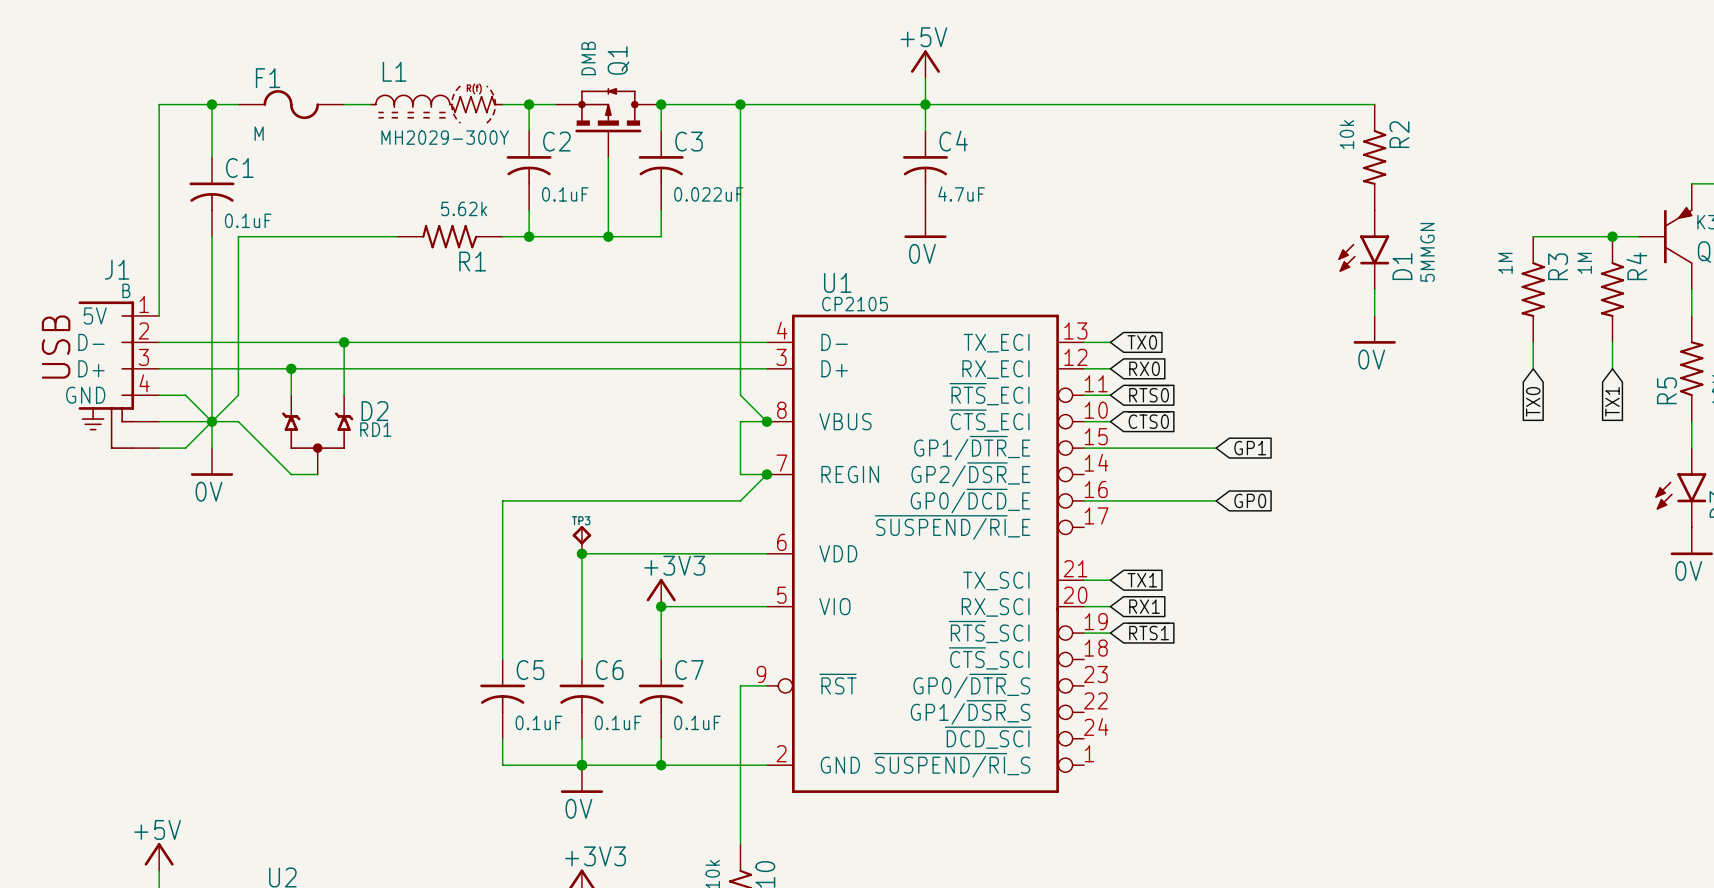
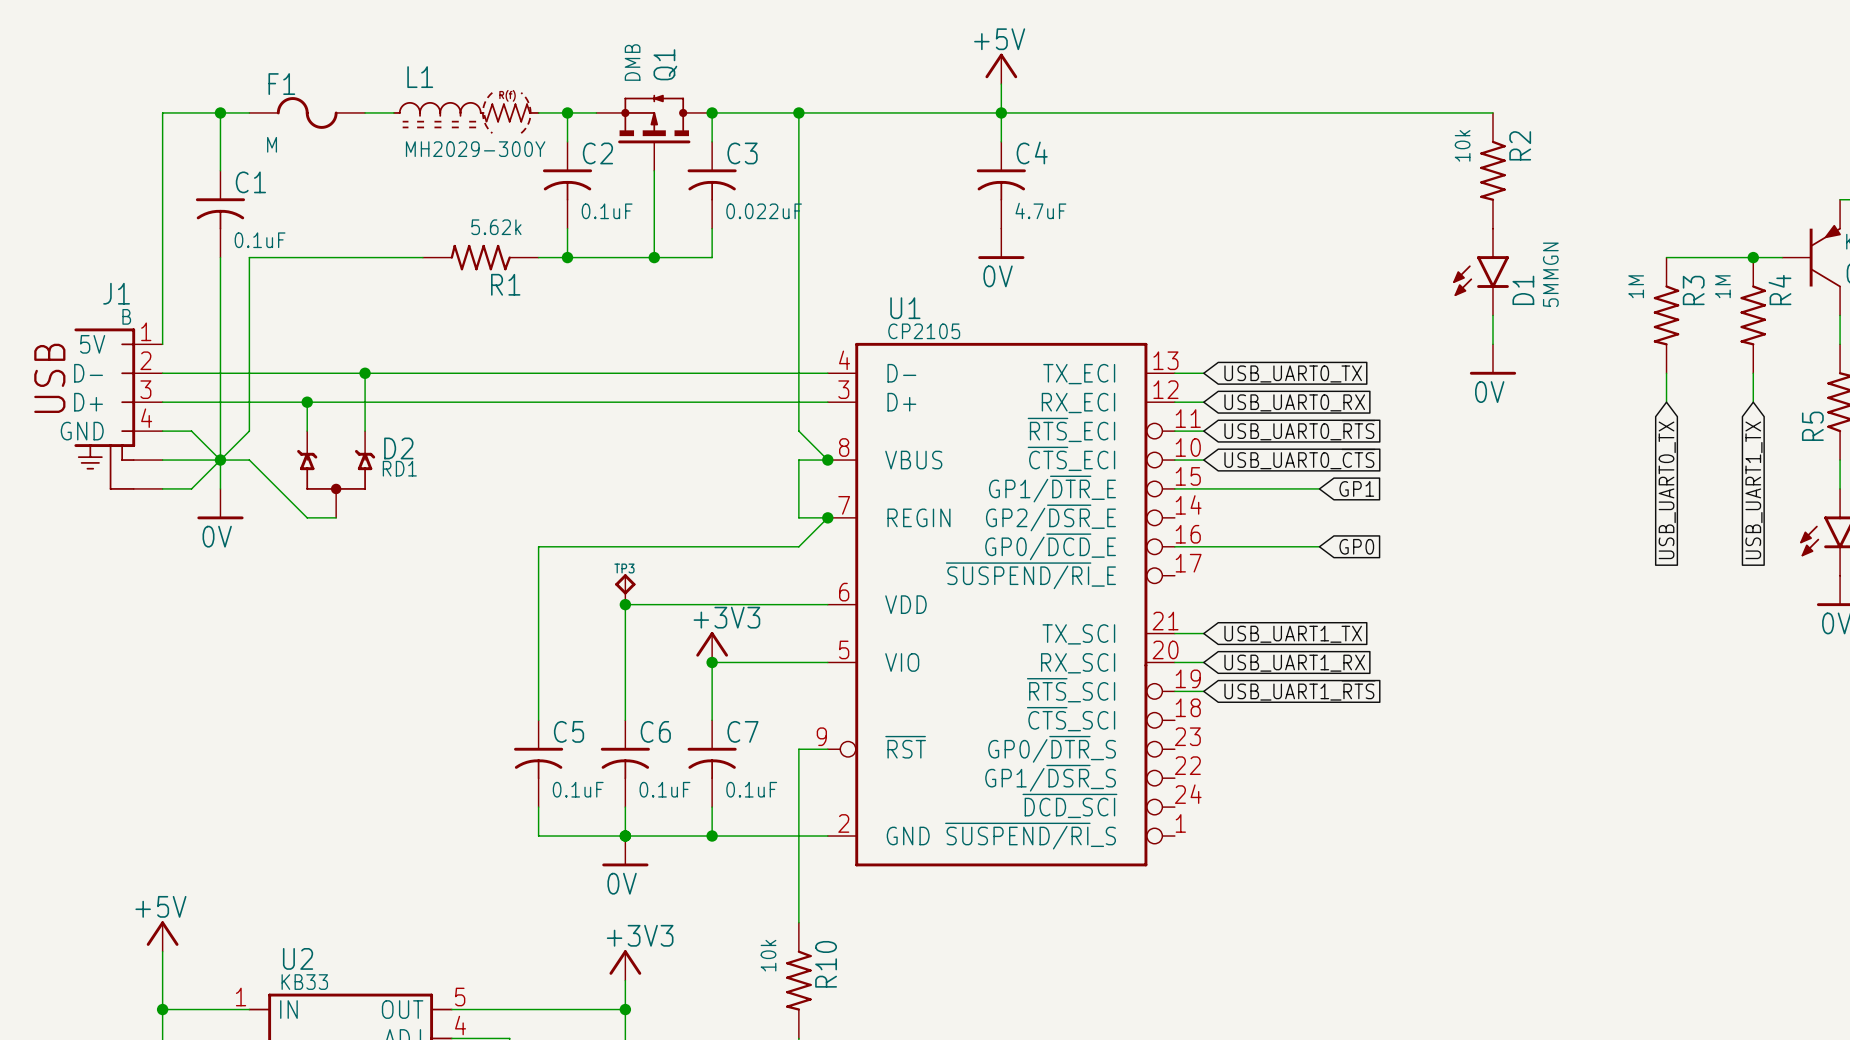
global label: TX0 (1142, 342) -> USB_UART0_TX (1293, 373)
global label: RX0 (1144, 368) -> USB_UART0_RX (1294, 402)
global label: ~{RTS0} (1148, 393) -> USB_UART0_~{RTS} (1299, 430)
global label: TX0 (1533, 401) -> USB_UART0_TX (1667, 490)
global label: TX1 (1612, 401) -> USB_UART1_TX (1753, 490)
global label: ~{CTS0} (1148, 420) -> USB_UART0_~{CTS} (1299, 459)
global label: TX1 (1142, 580) -> USB_UART1_TX (1293, 634)
global label: RX1 (1144, 606) -> USB_UART1_RX (1294, 663)
global label: ~{RTS1} (1148, 631) -> USB_UART1_~{RTS} (1299, 690)

